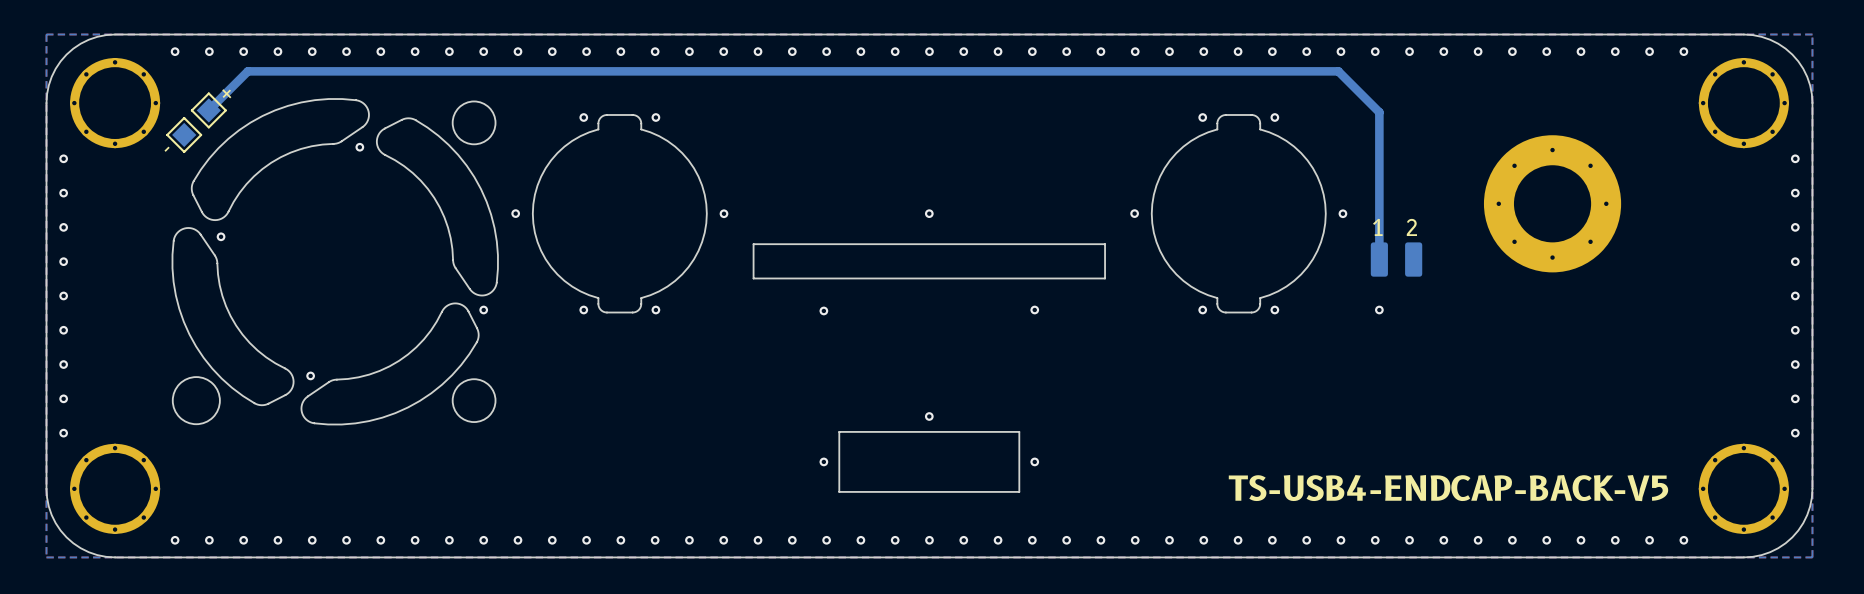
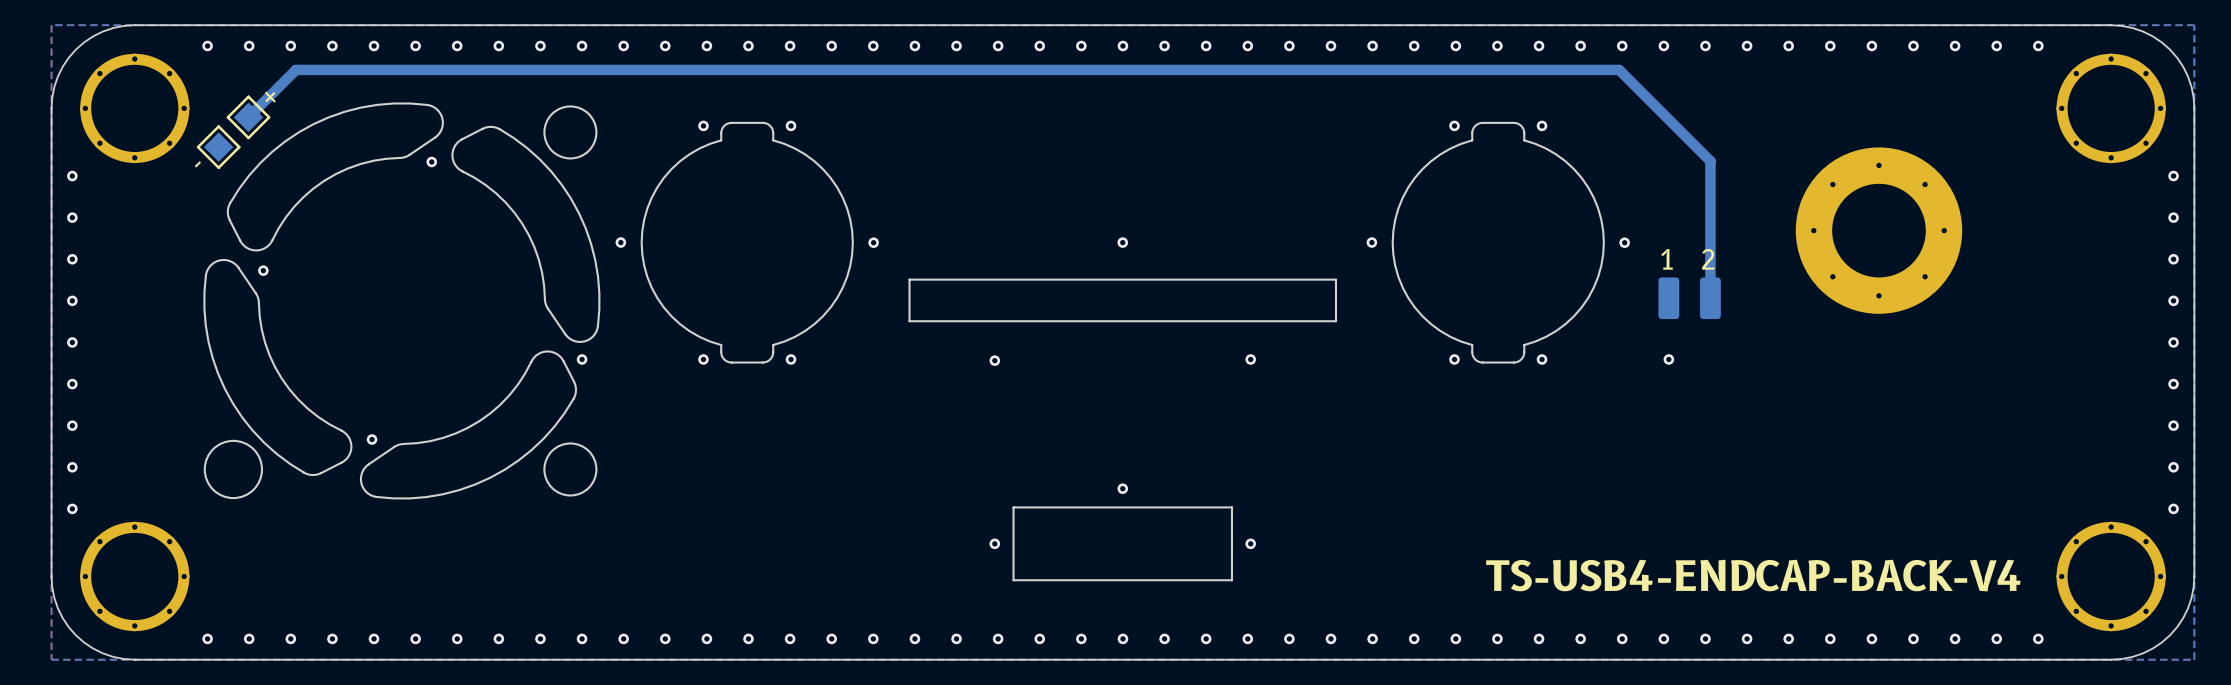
bottom track: (1379, 112) (1379, 259) -> (1668, 119) (1710, 161) (1710, 298)
text: TS-USB4-ENDCAP-BACK-V5 (1448, 488) -> TS-USB4-ENDCAP-BACK-V4 (1753, 575)

